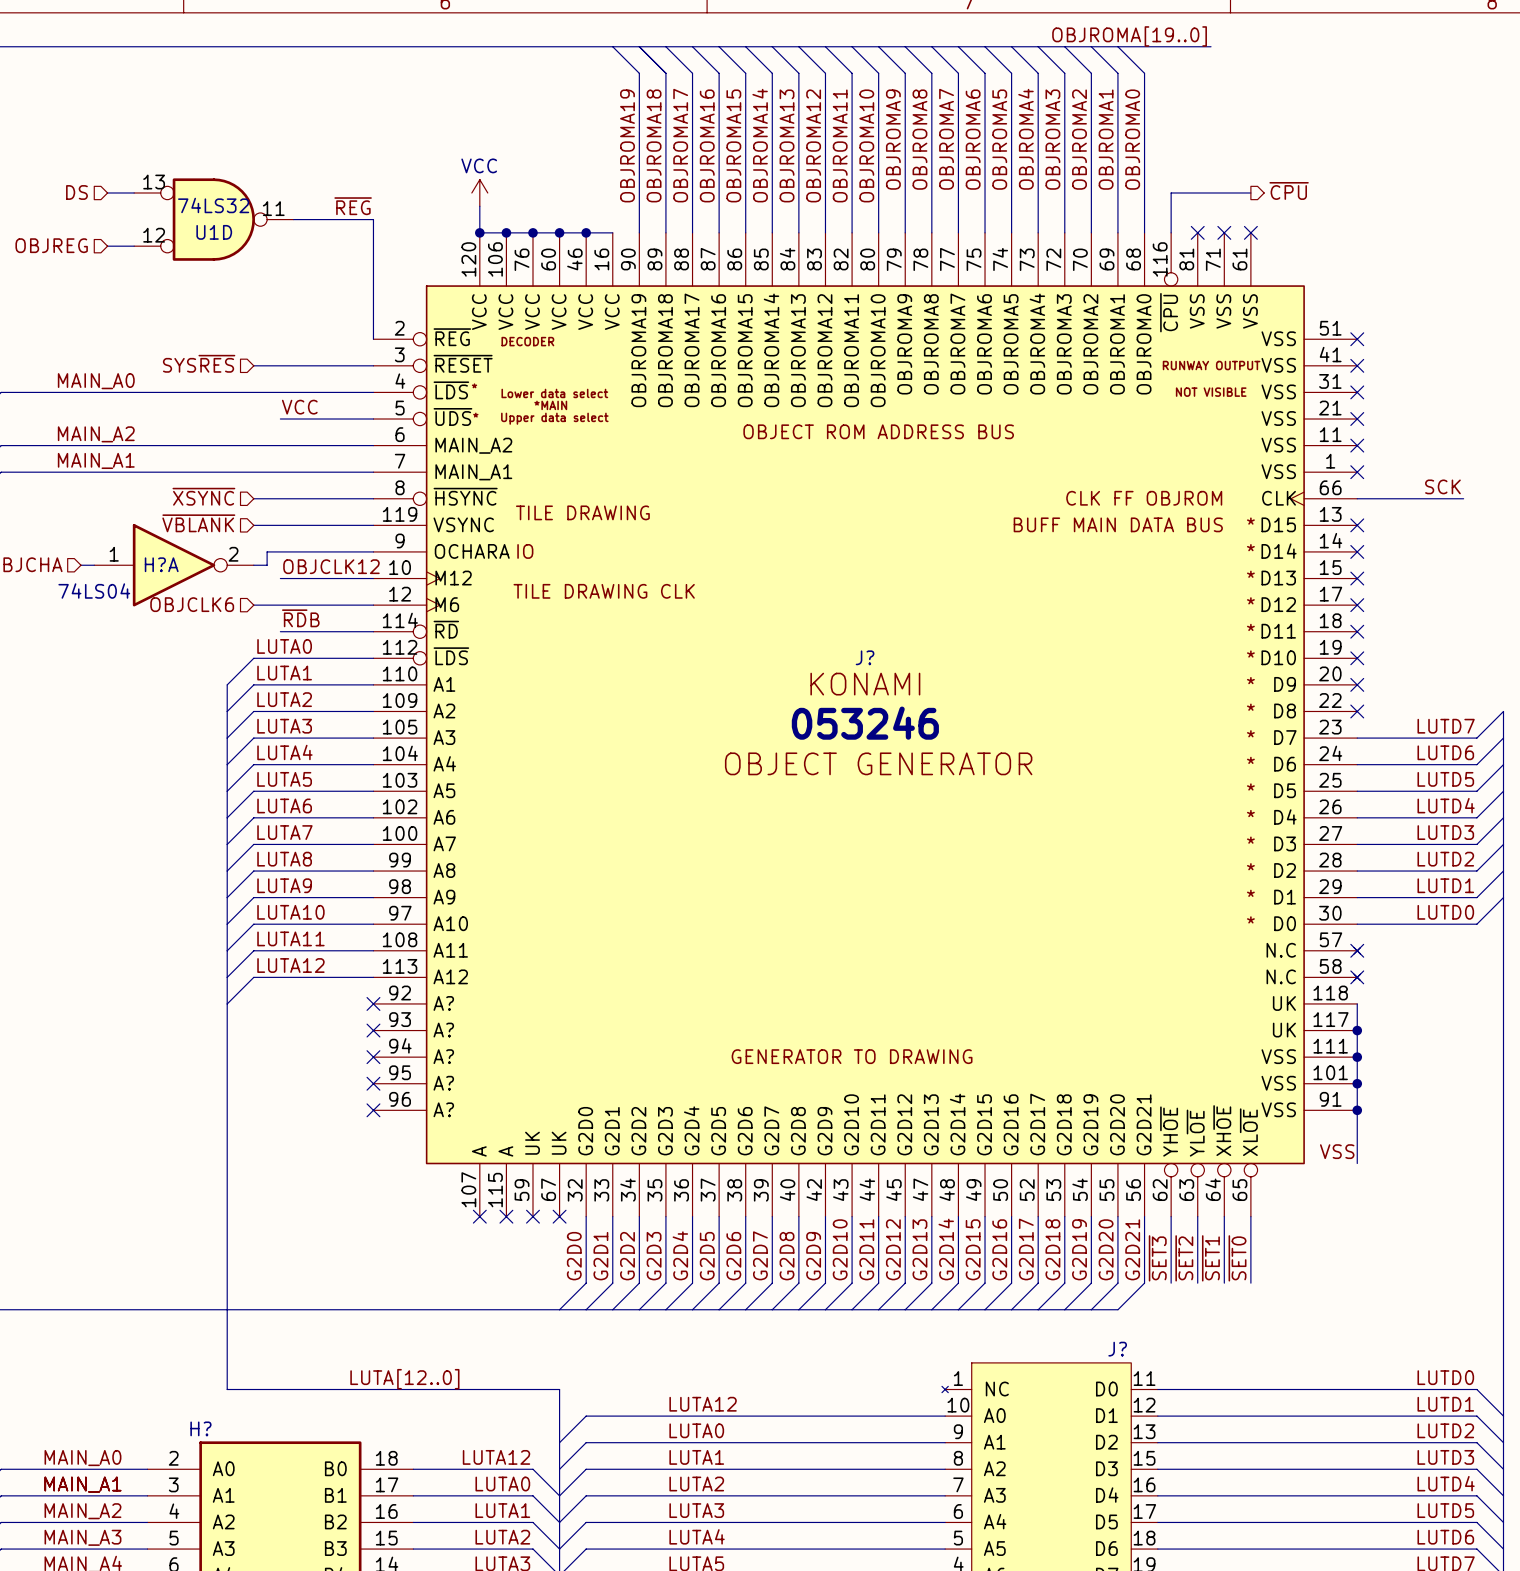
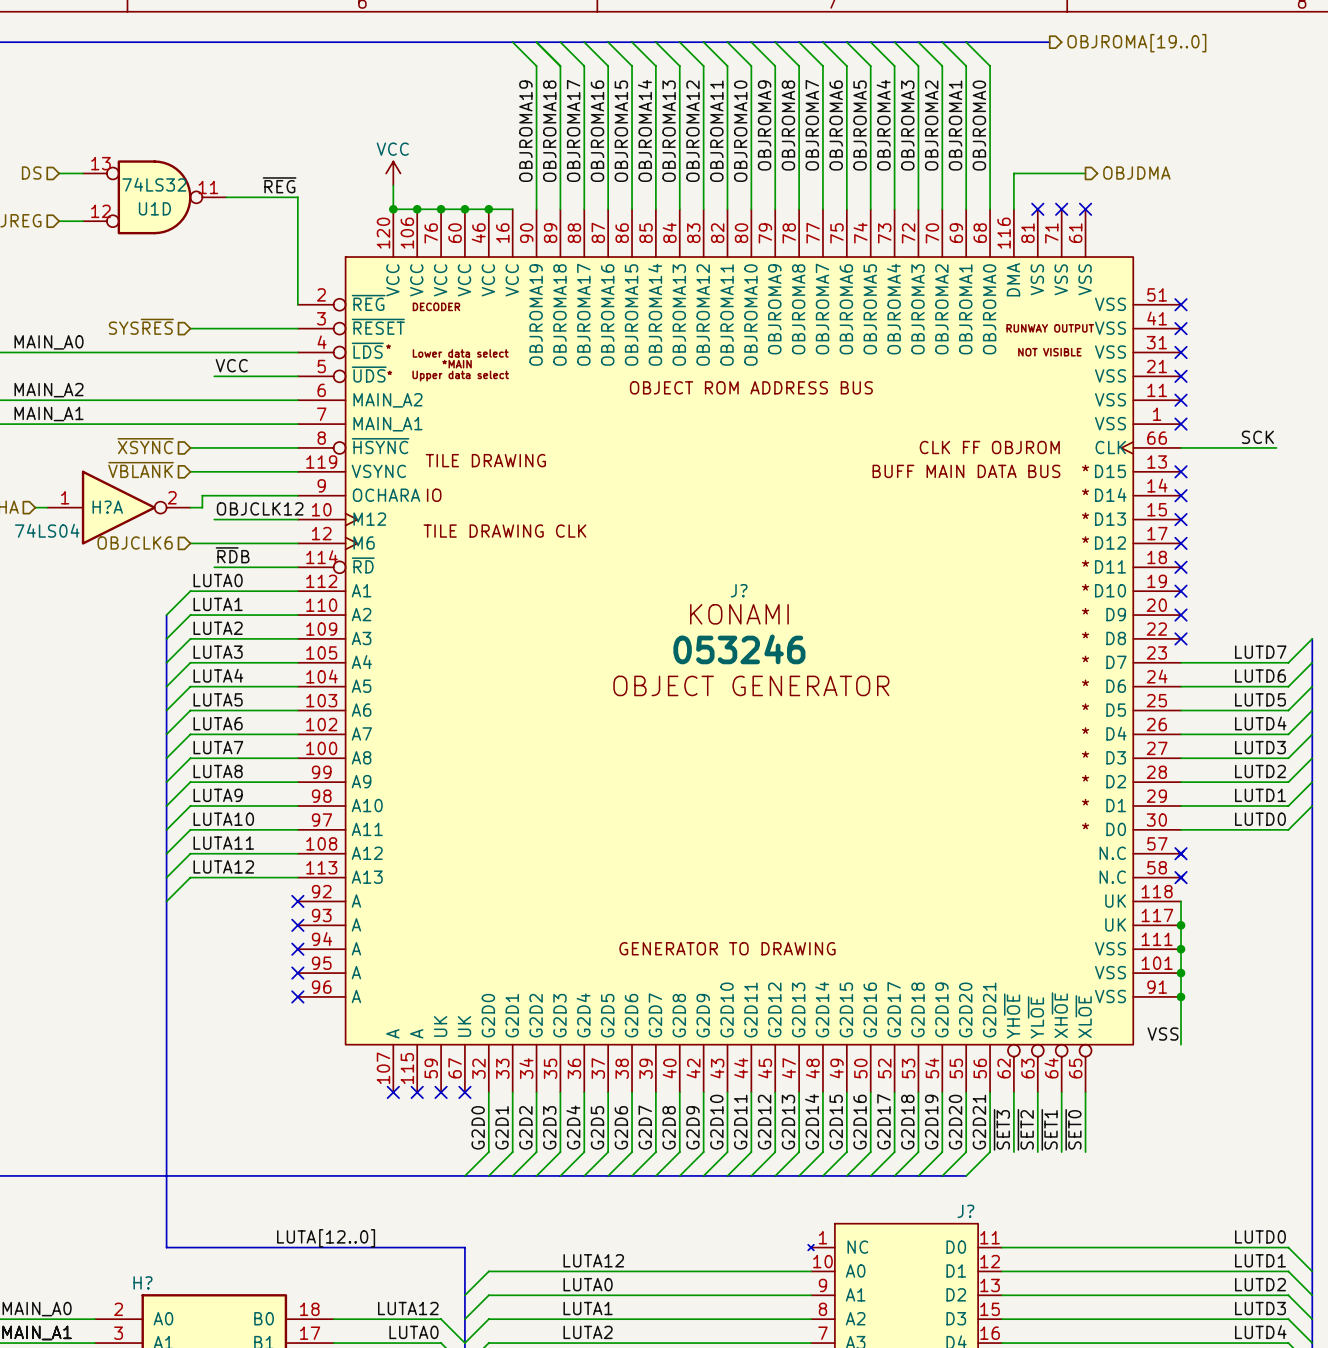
label: OBJROMA[19..0] (1129, 36) -> none
hierarchical label: none -> OBJROMA[19..0] (1136, 43)
hierarchical label: ~{CPU} (1289, 190) -> OBJDMA (1136, 173)
J? symbol: [373, 232, 1361, 1217] -> [297, 209, 1184, 1093]

